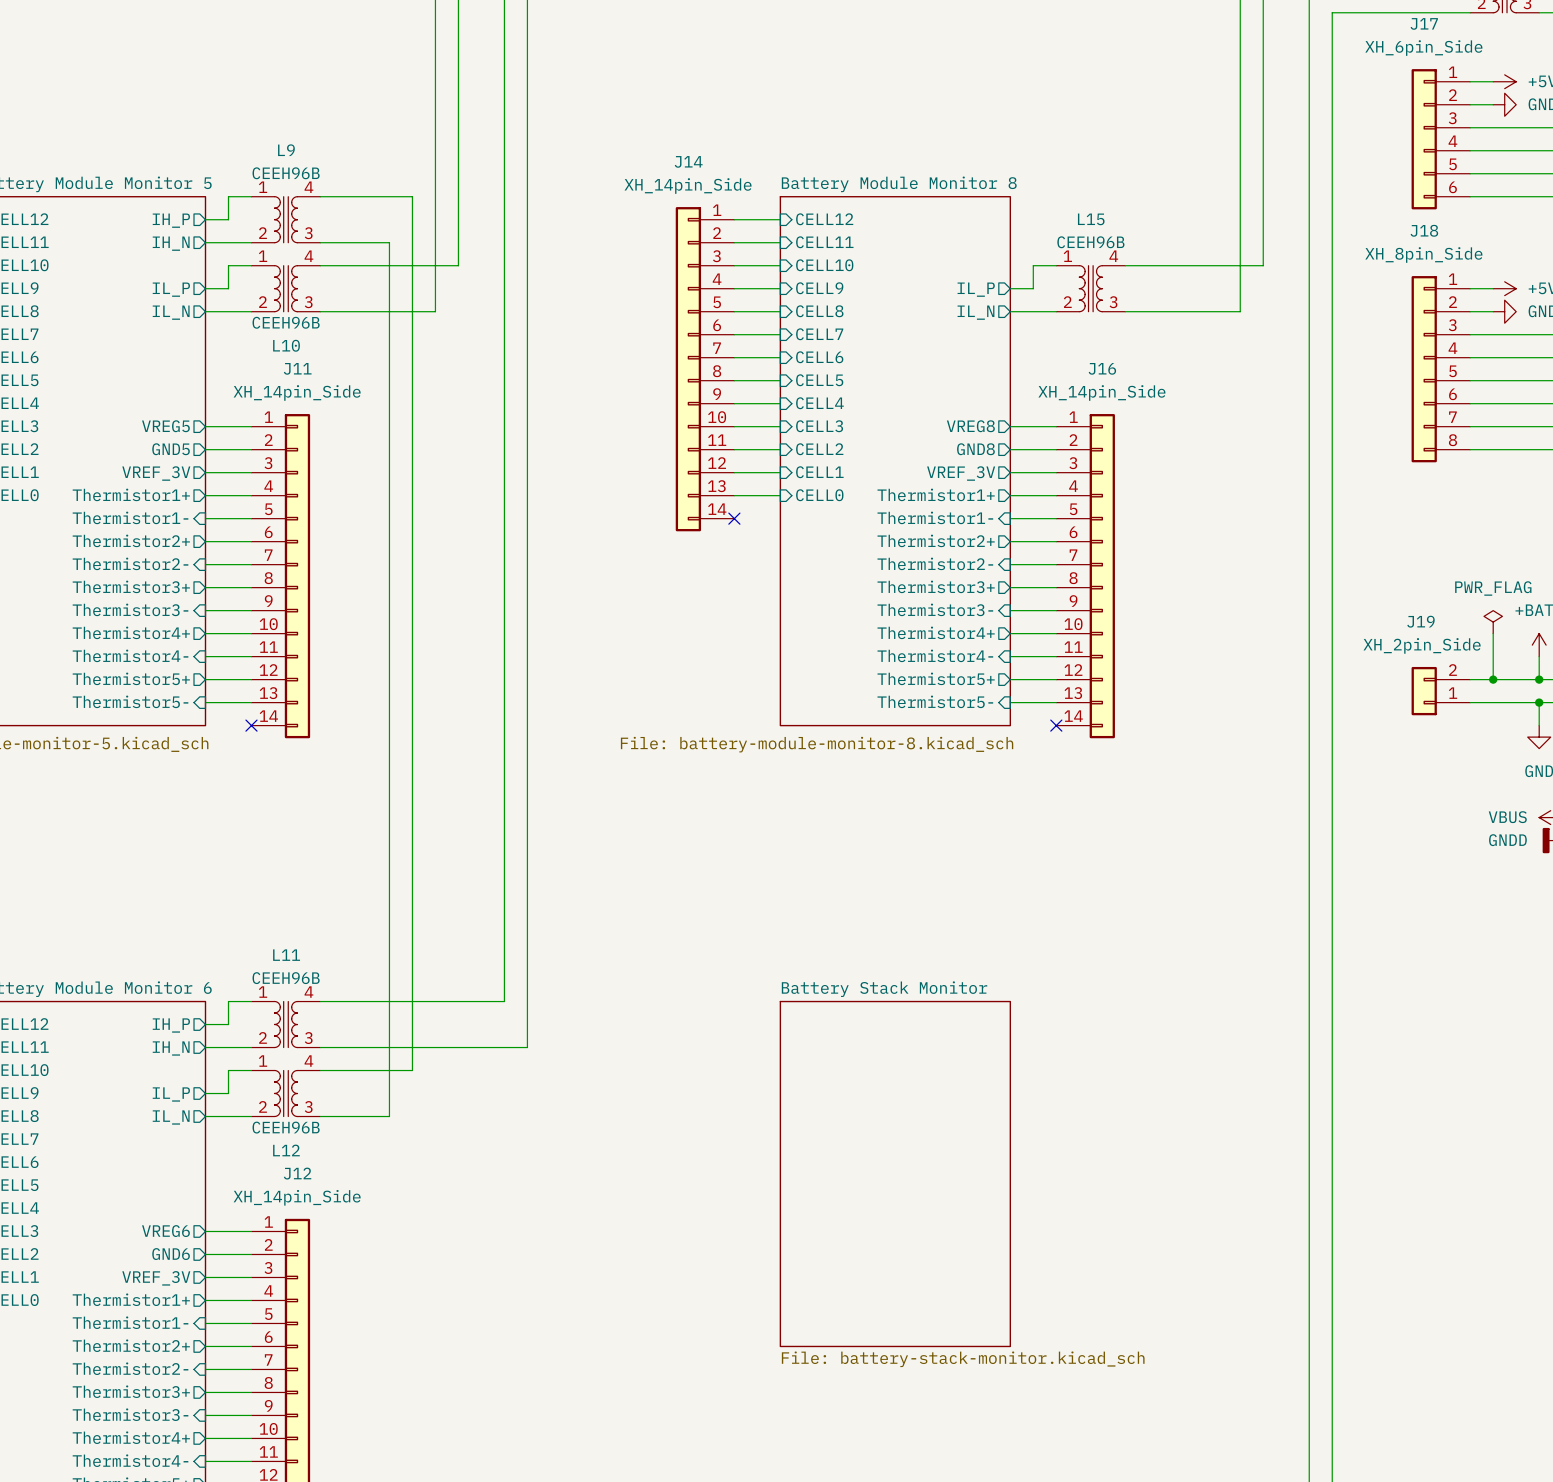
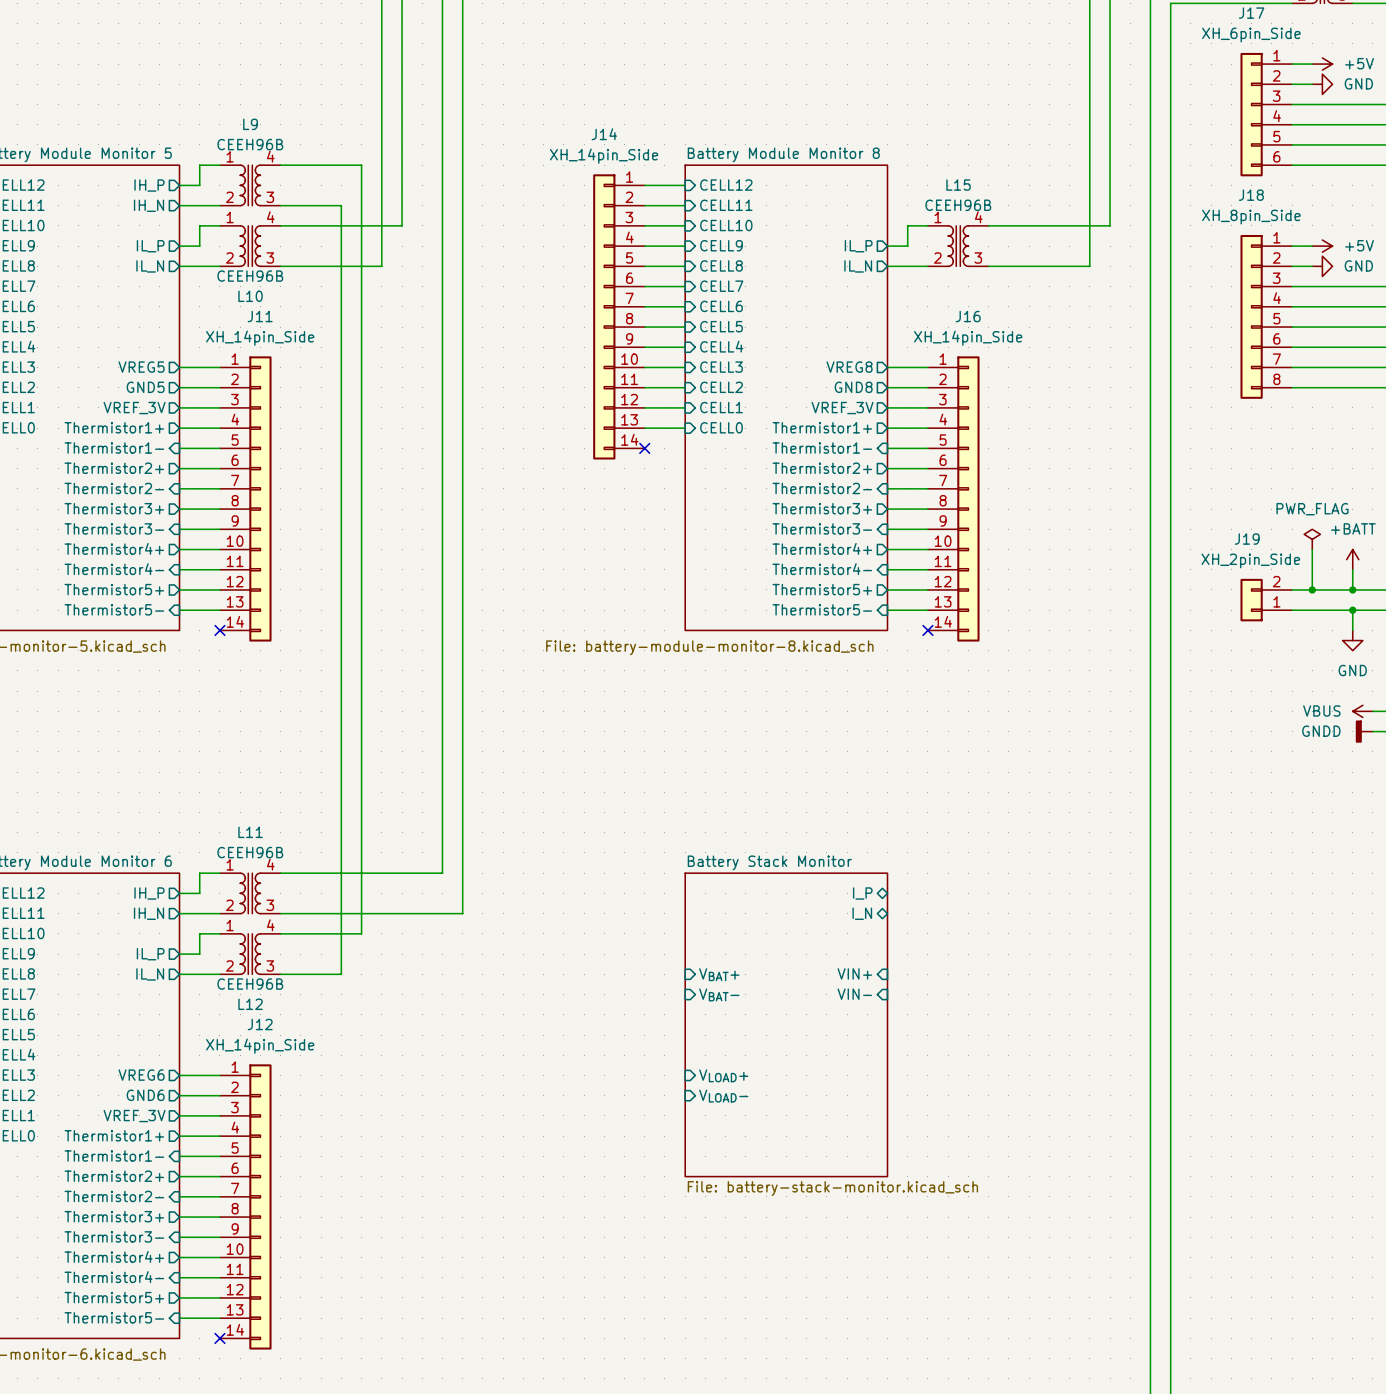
sheet pin: none -> I_P (862, 893)
sheet pin: none -> I_N (862, 913)
sheet pin: none -> VBAT+ (719, 974)
sheet pin: none -> VIN+ (854, 973)
sheet pin: none -> VBAT- (719, 994)
sheet pin: none -> VIN- (854, 994)
sheet pin: none -> VLOAD+ (723, 1075)
sheet pin: none -> VLOAD- (723, 1096)

